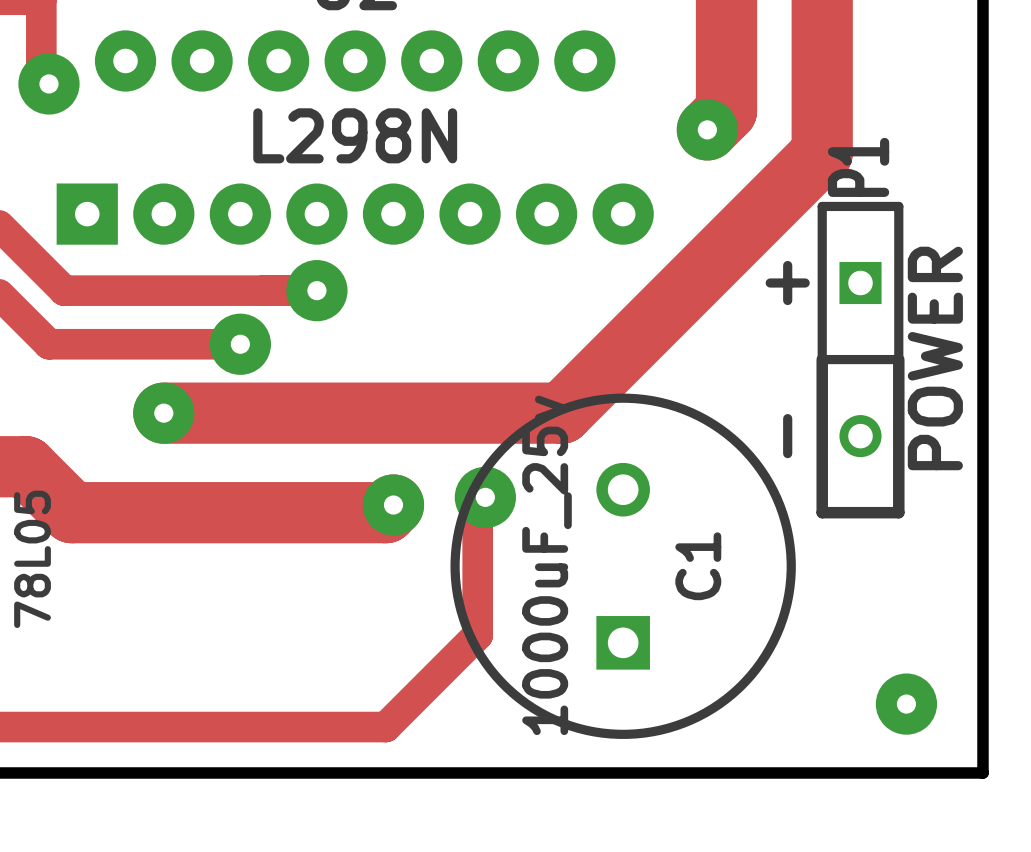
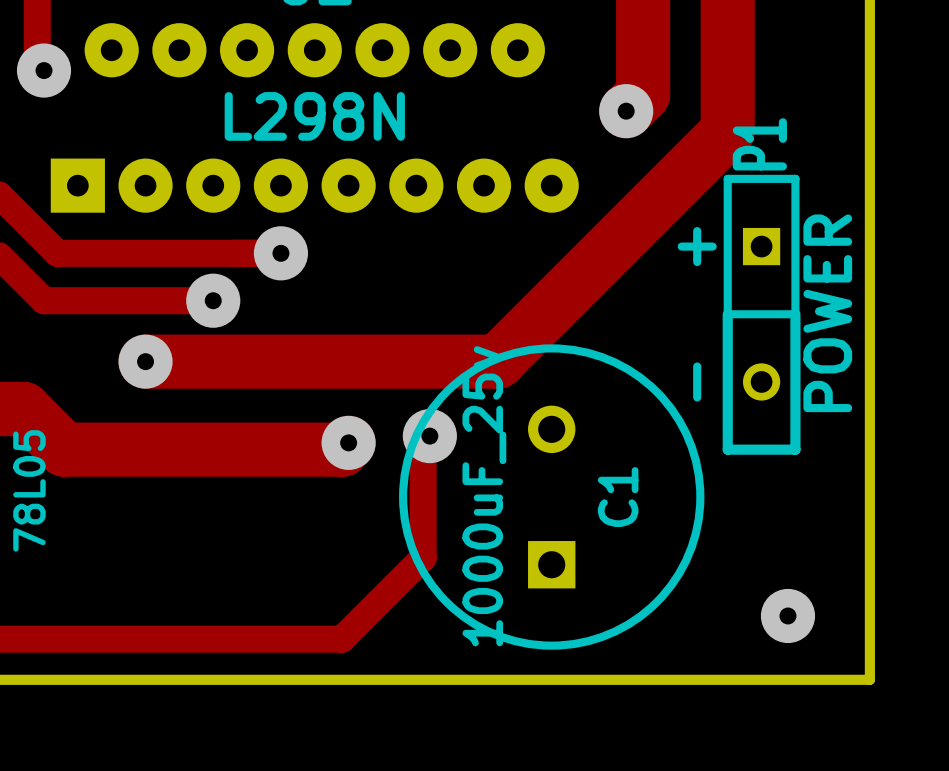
via position: (906, 704) -> (787, 615)

